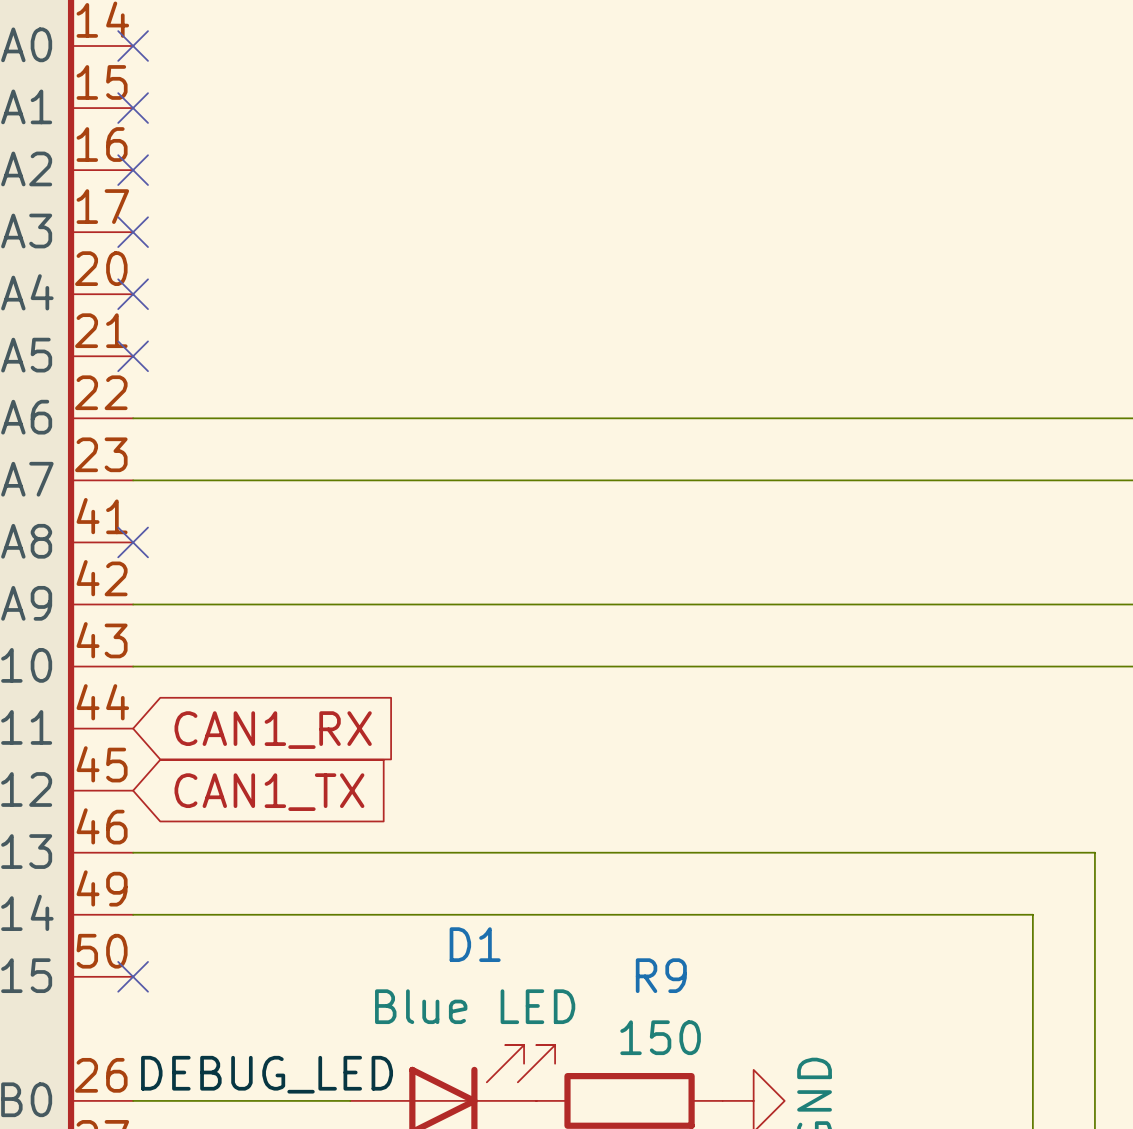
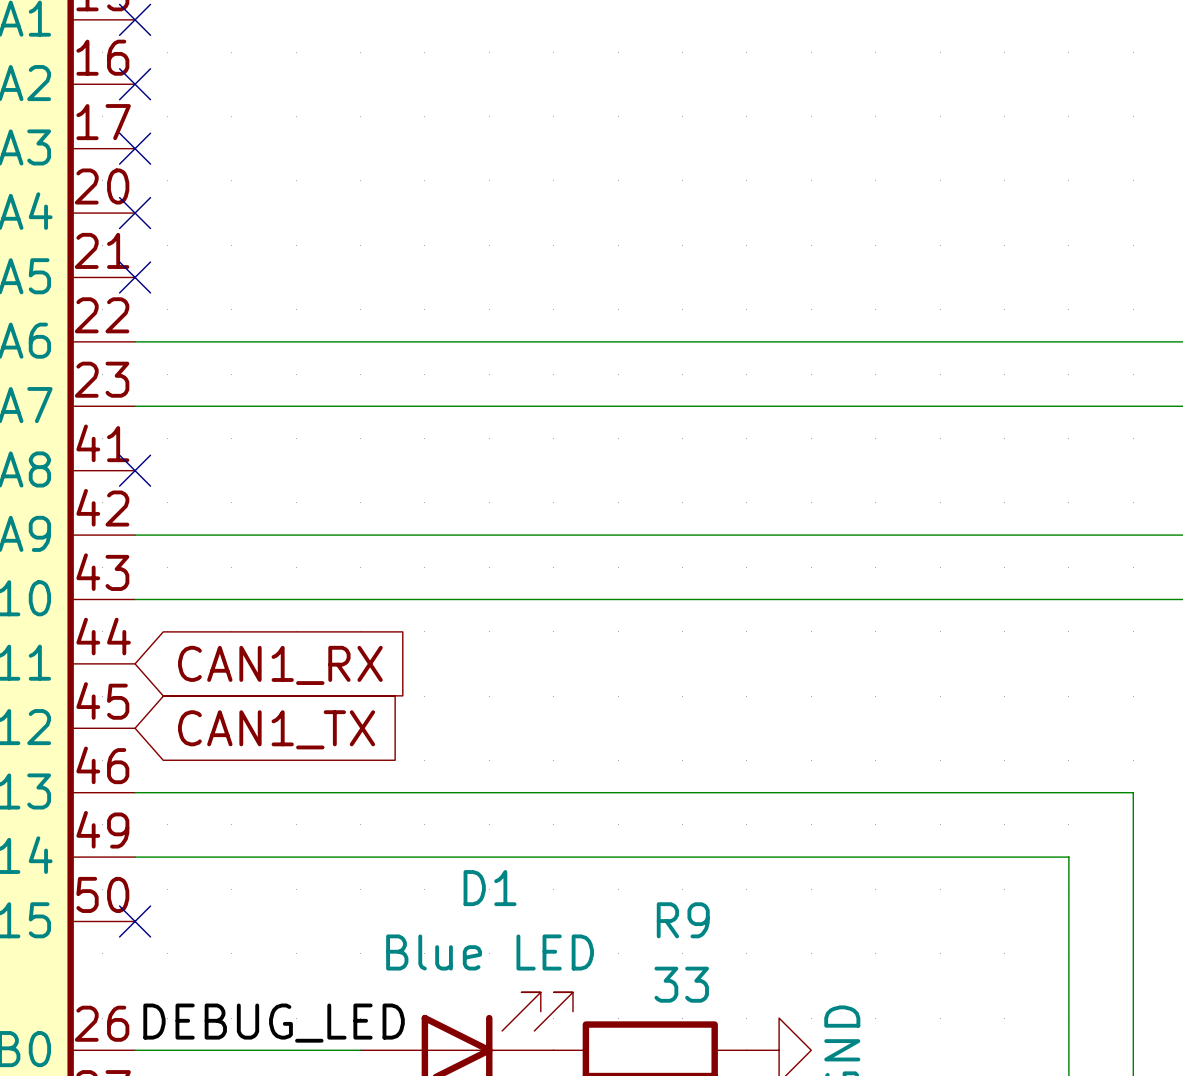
R9 value: 150 (660, 1037) -> 33 (681, 984)

